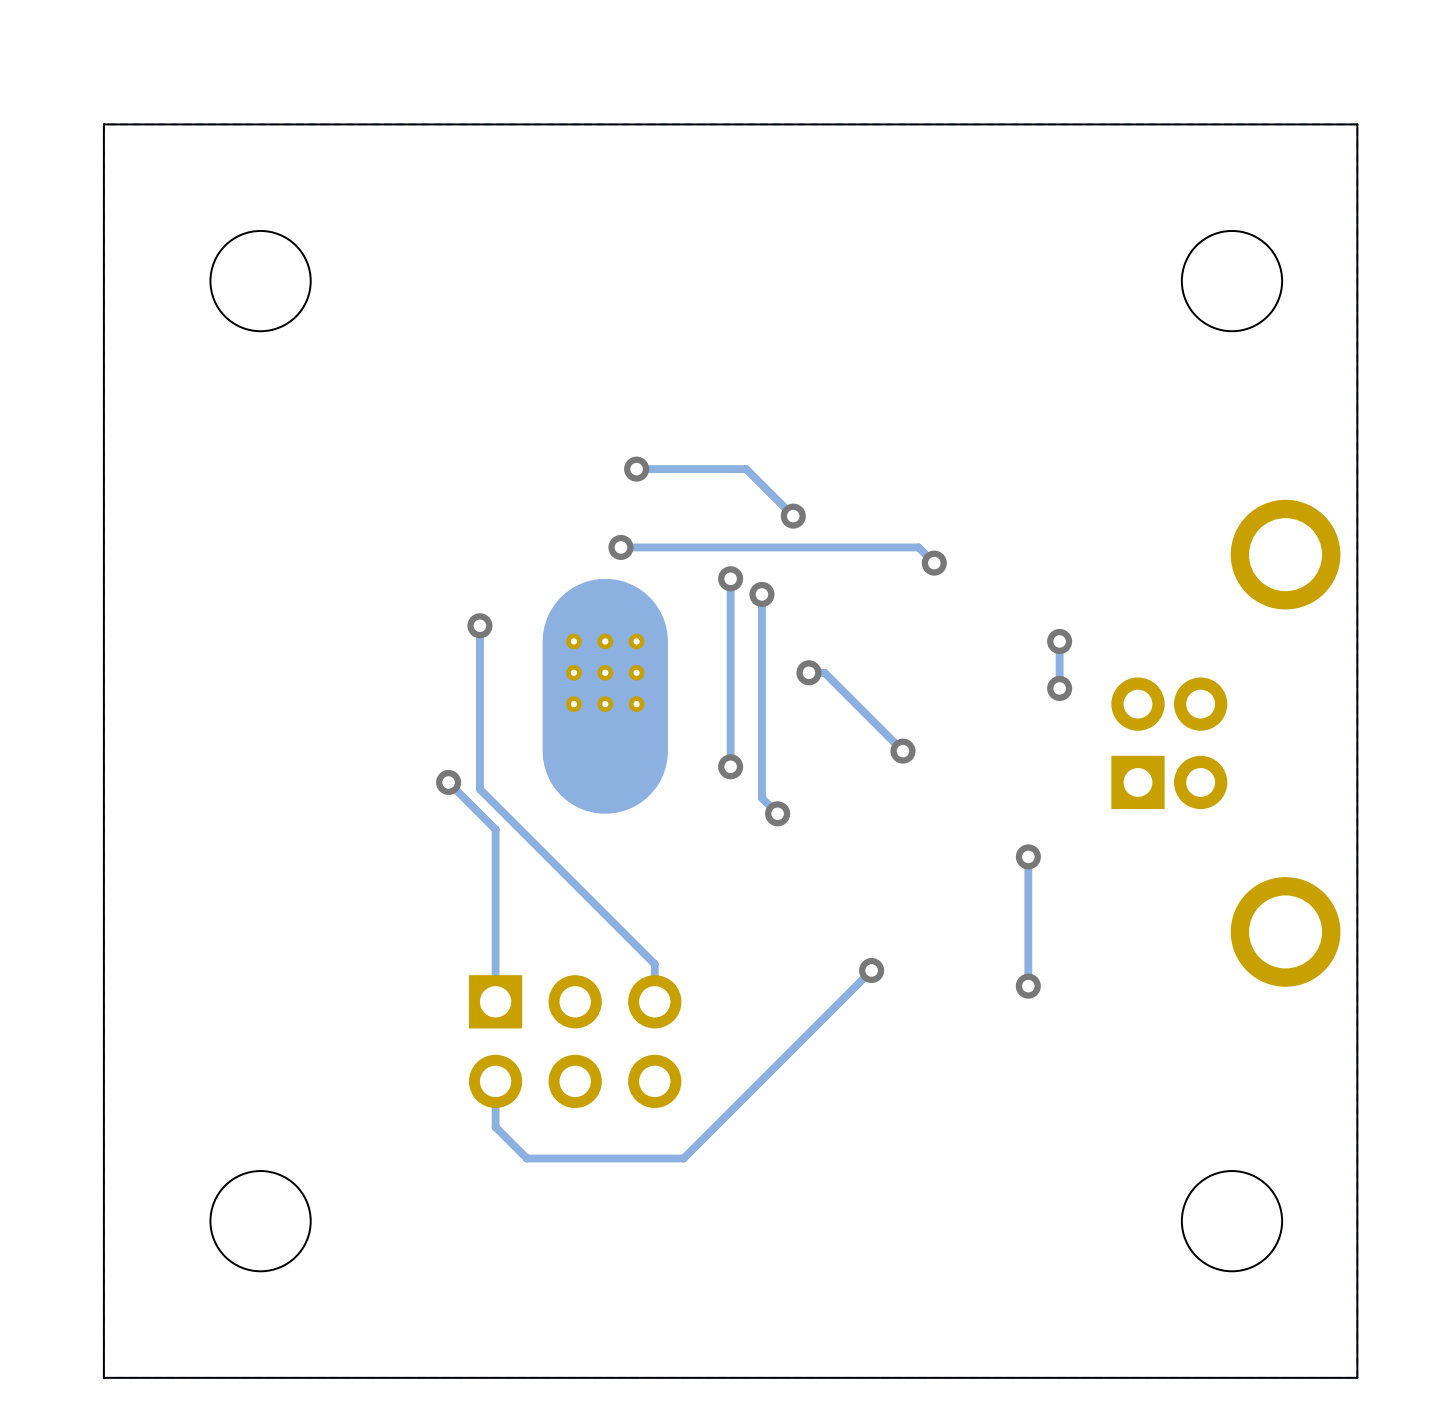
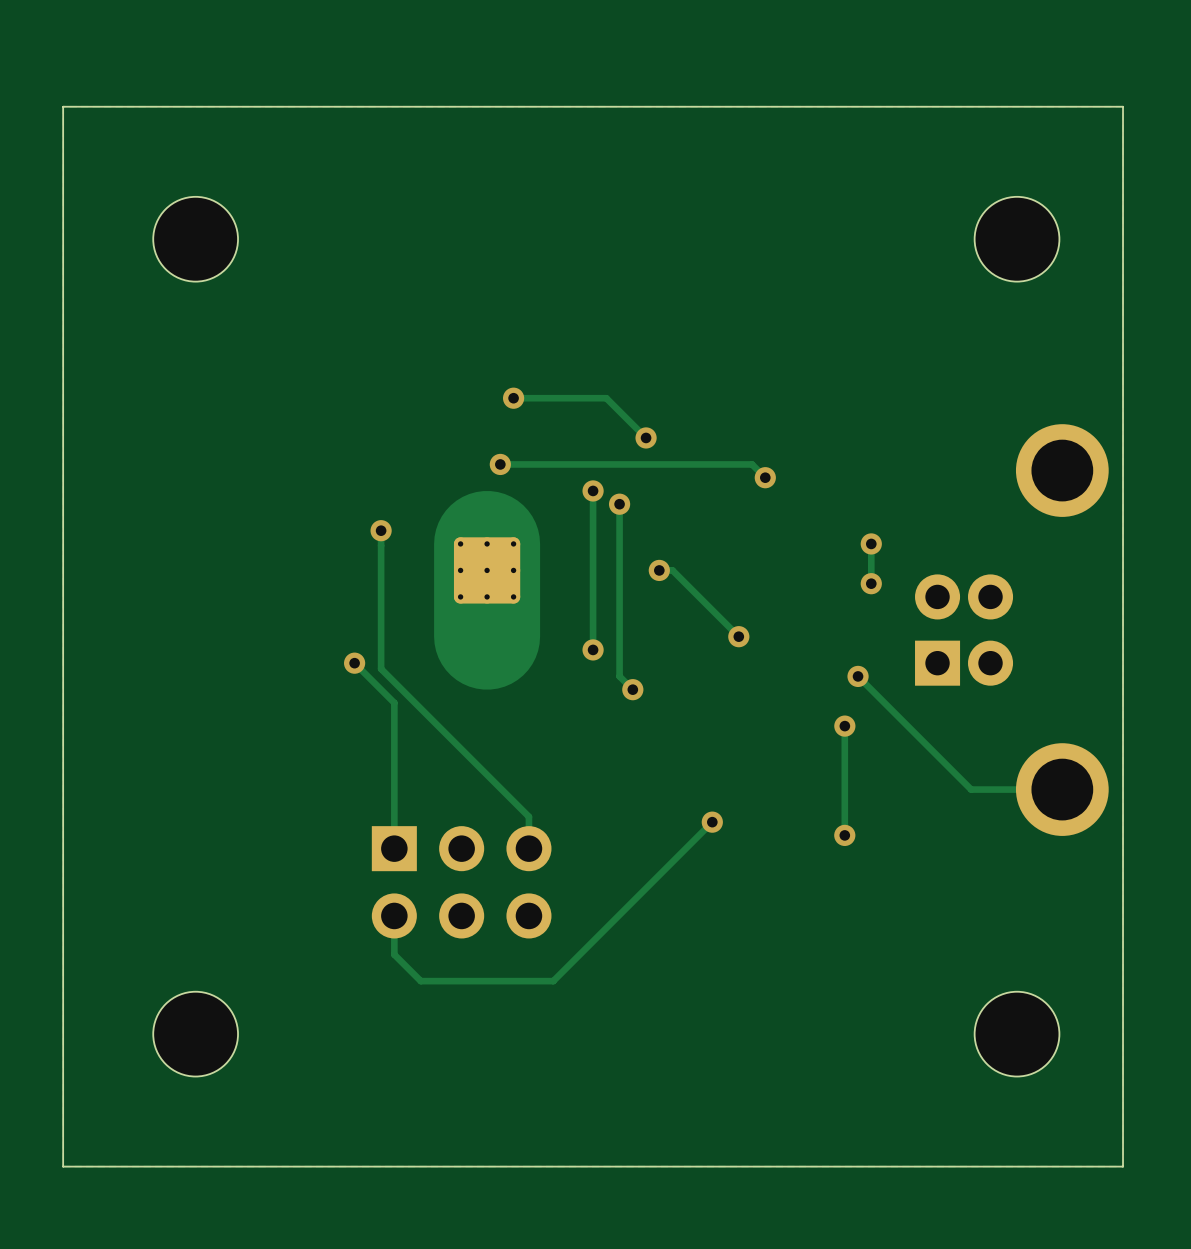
track: none -> (858, 676) (971, 789) (1062, 789)
via: none -> (858, 676)

